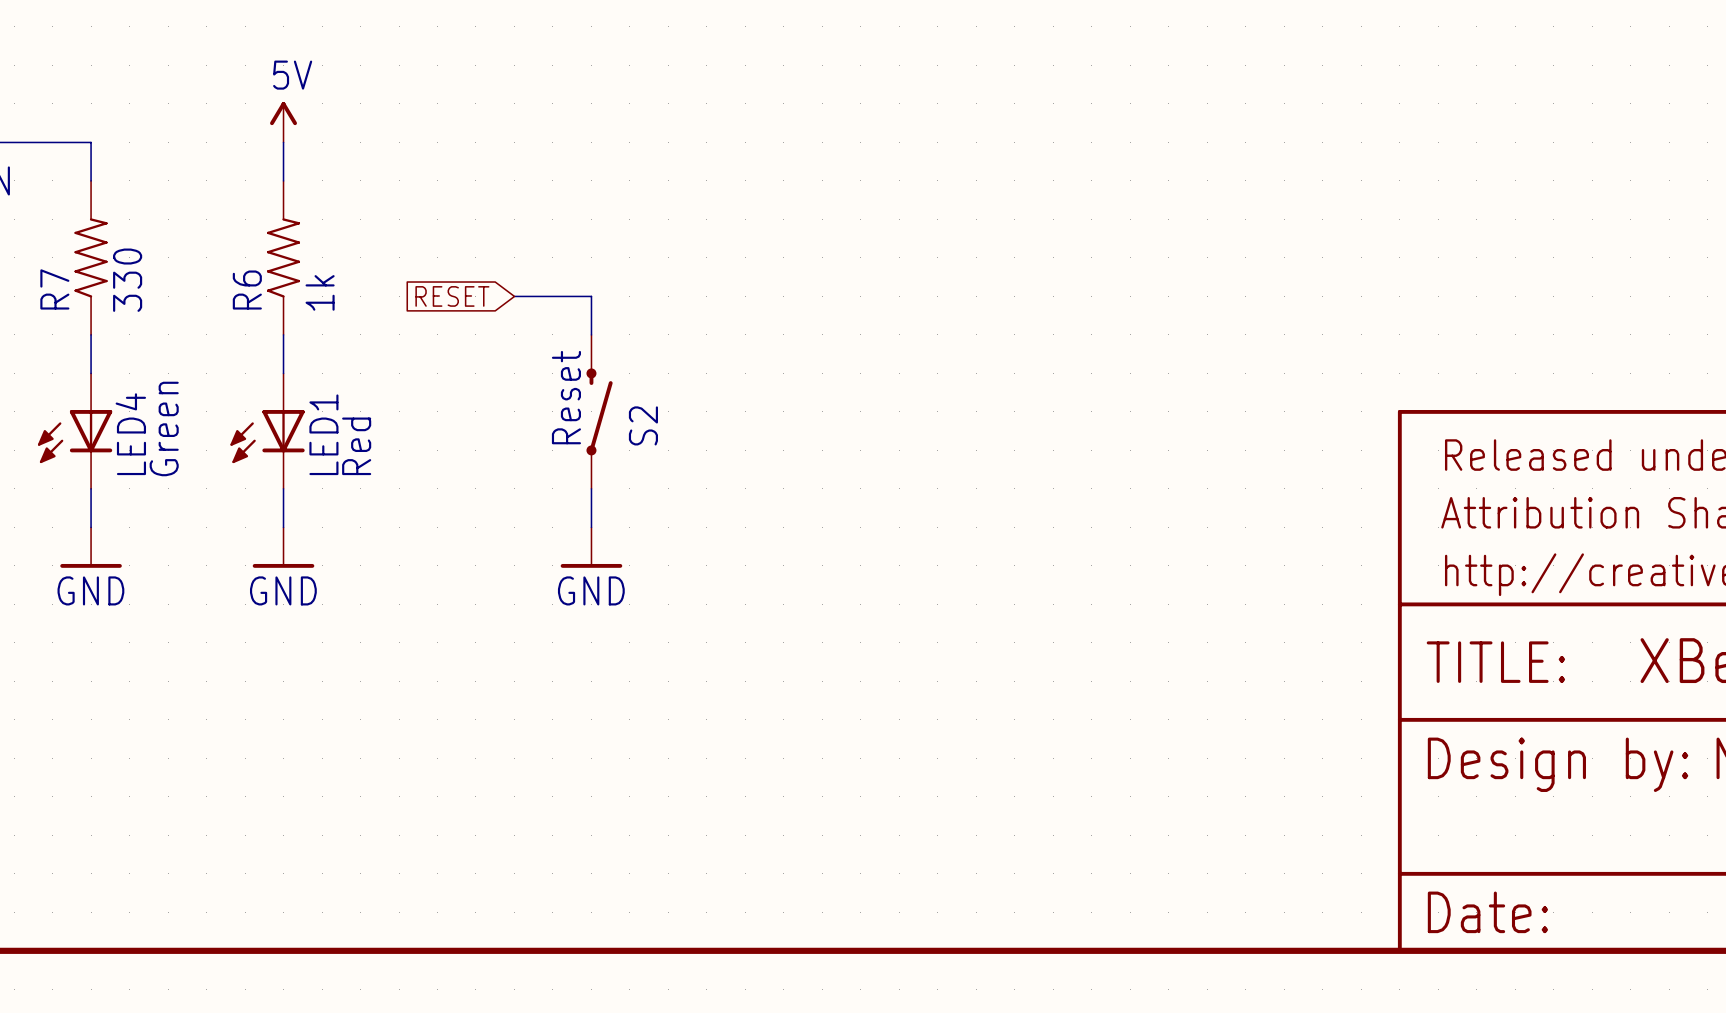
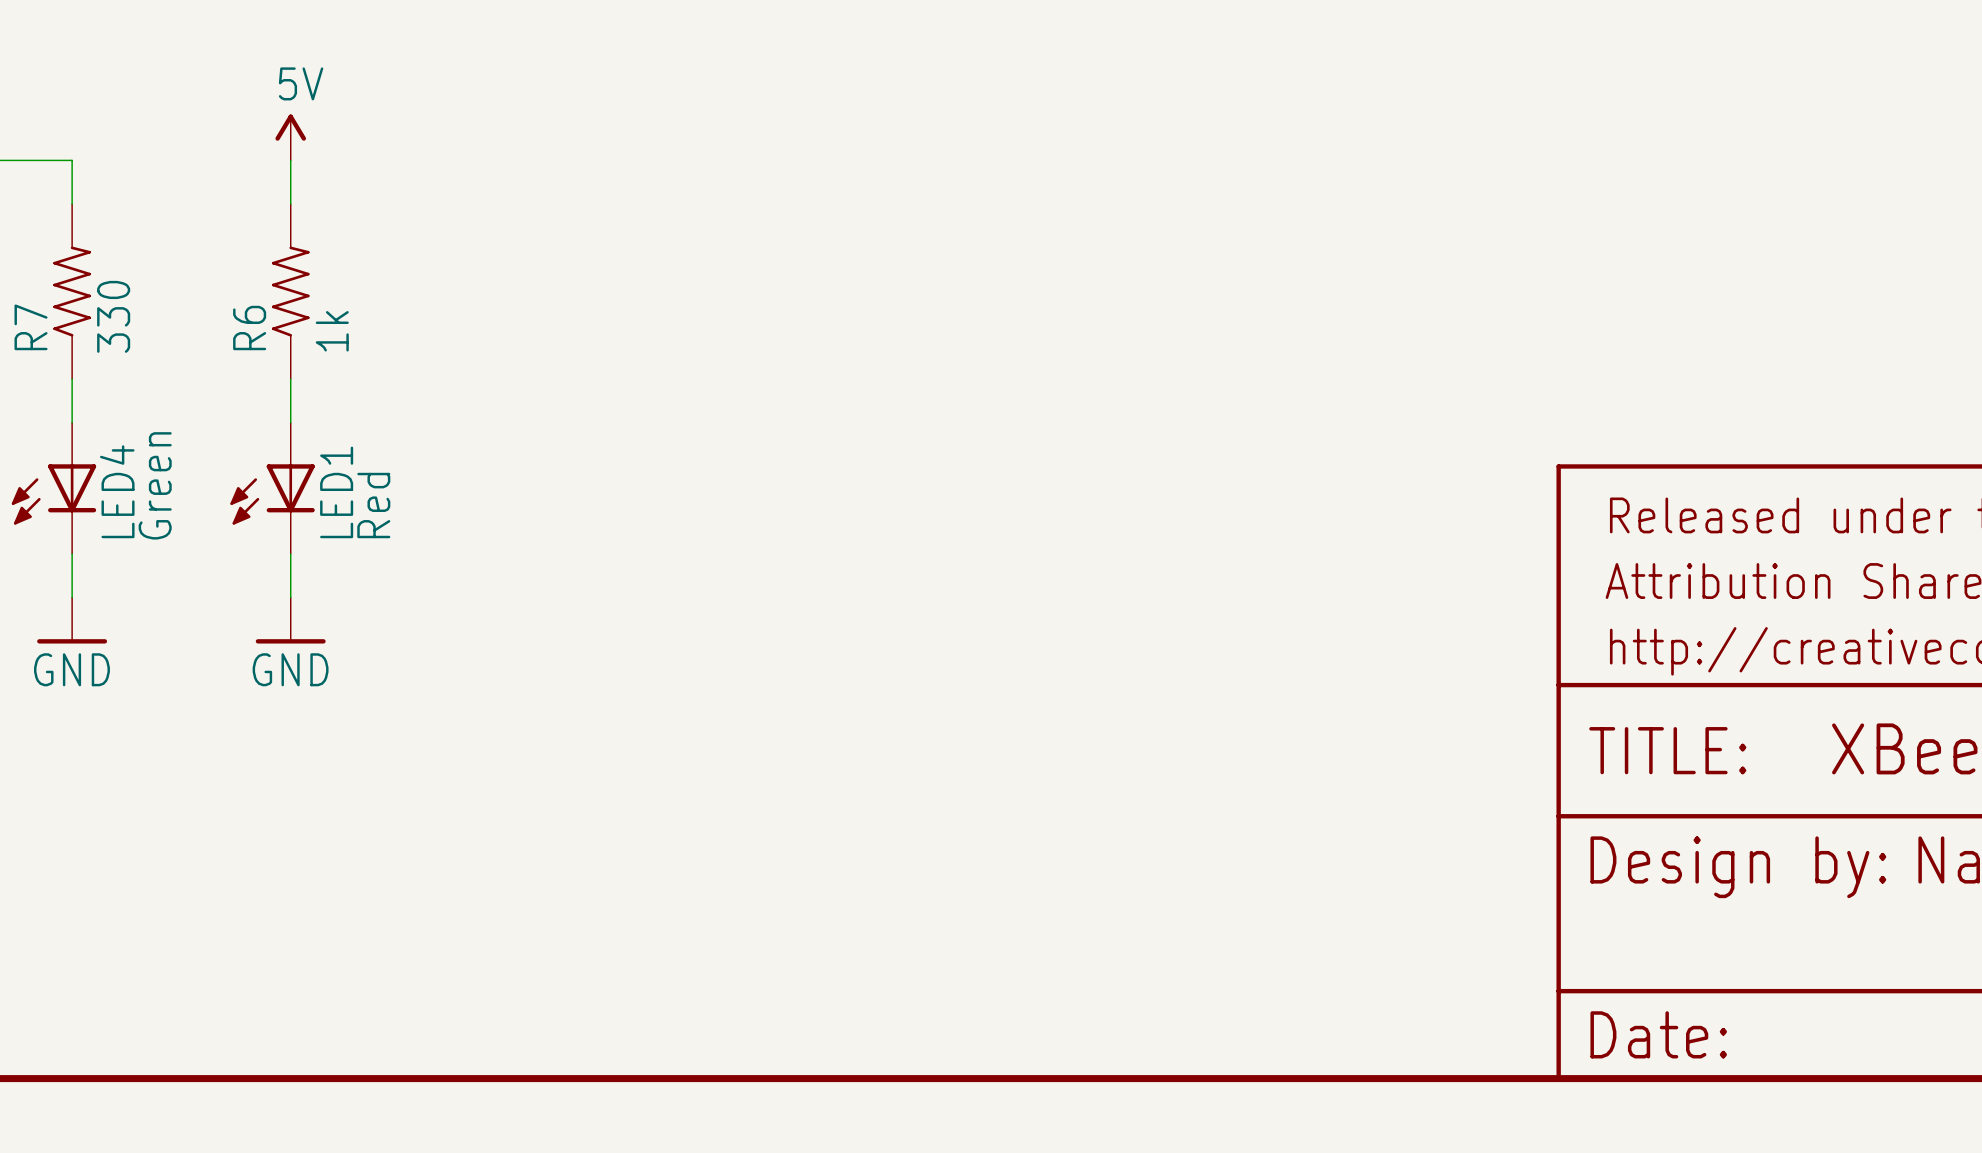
global label: RESET (452, 296) -> none
wire: (514, 296) (591, 296) (591, 334) -> none
S2: Reset (599, 411) -> none
wire: (591, 488) (591, 527) -> none
power symbol: GND (591, 547) -> none

